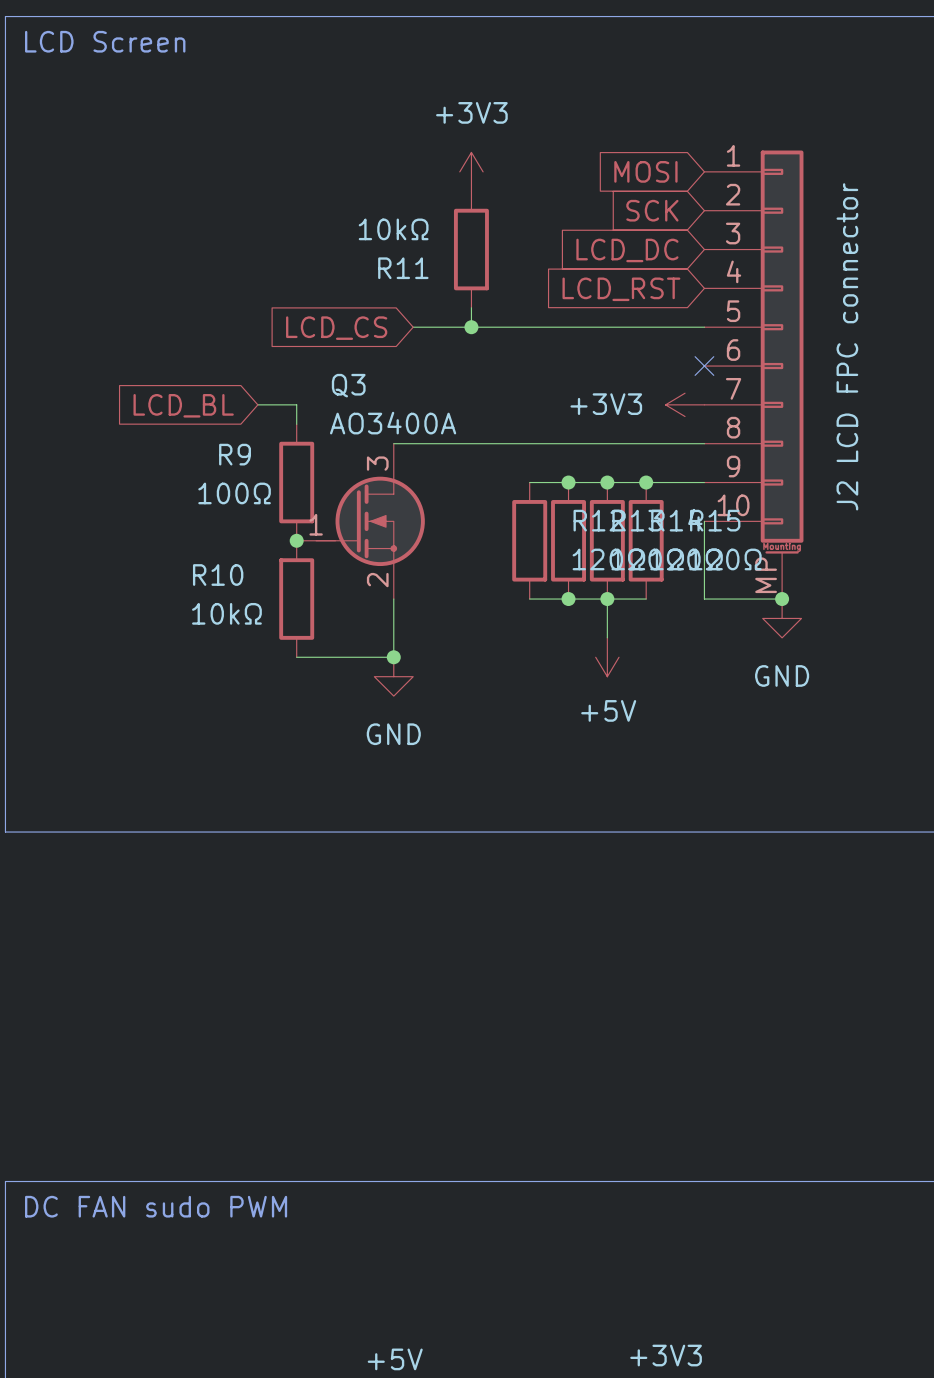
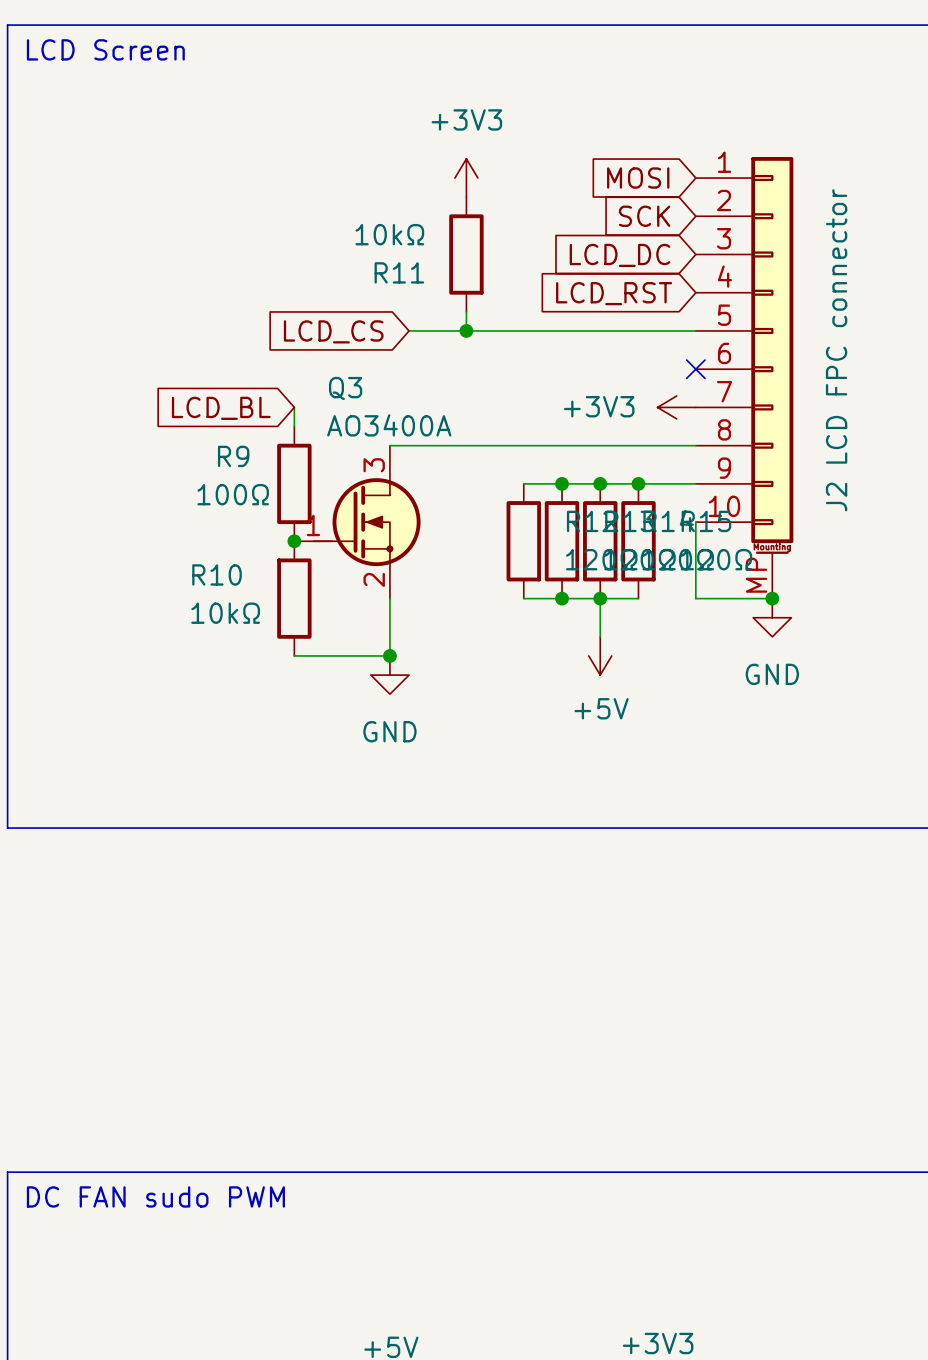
wire: (257, 404) (296, 404) -> none
global label position: LCD_BL (183, 405) -> LCD_BL (221, 408)

